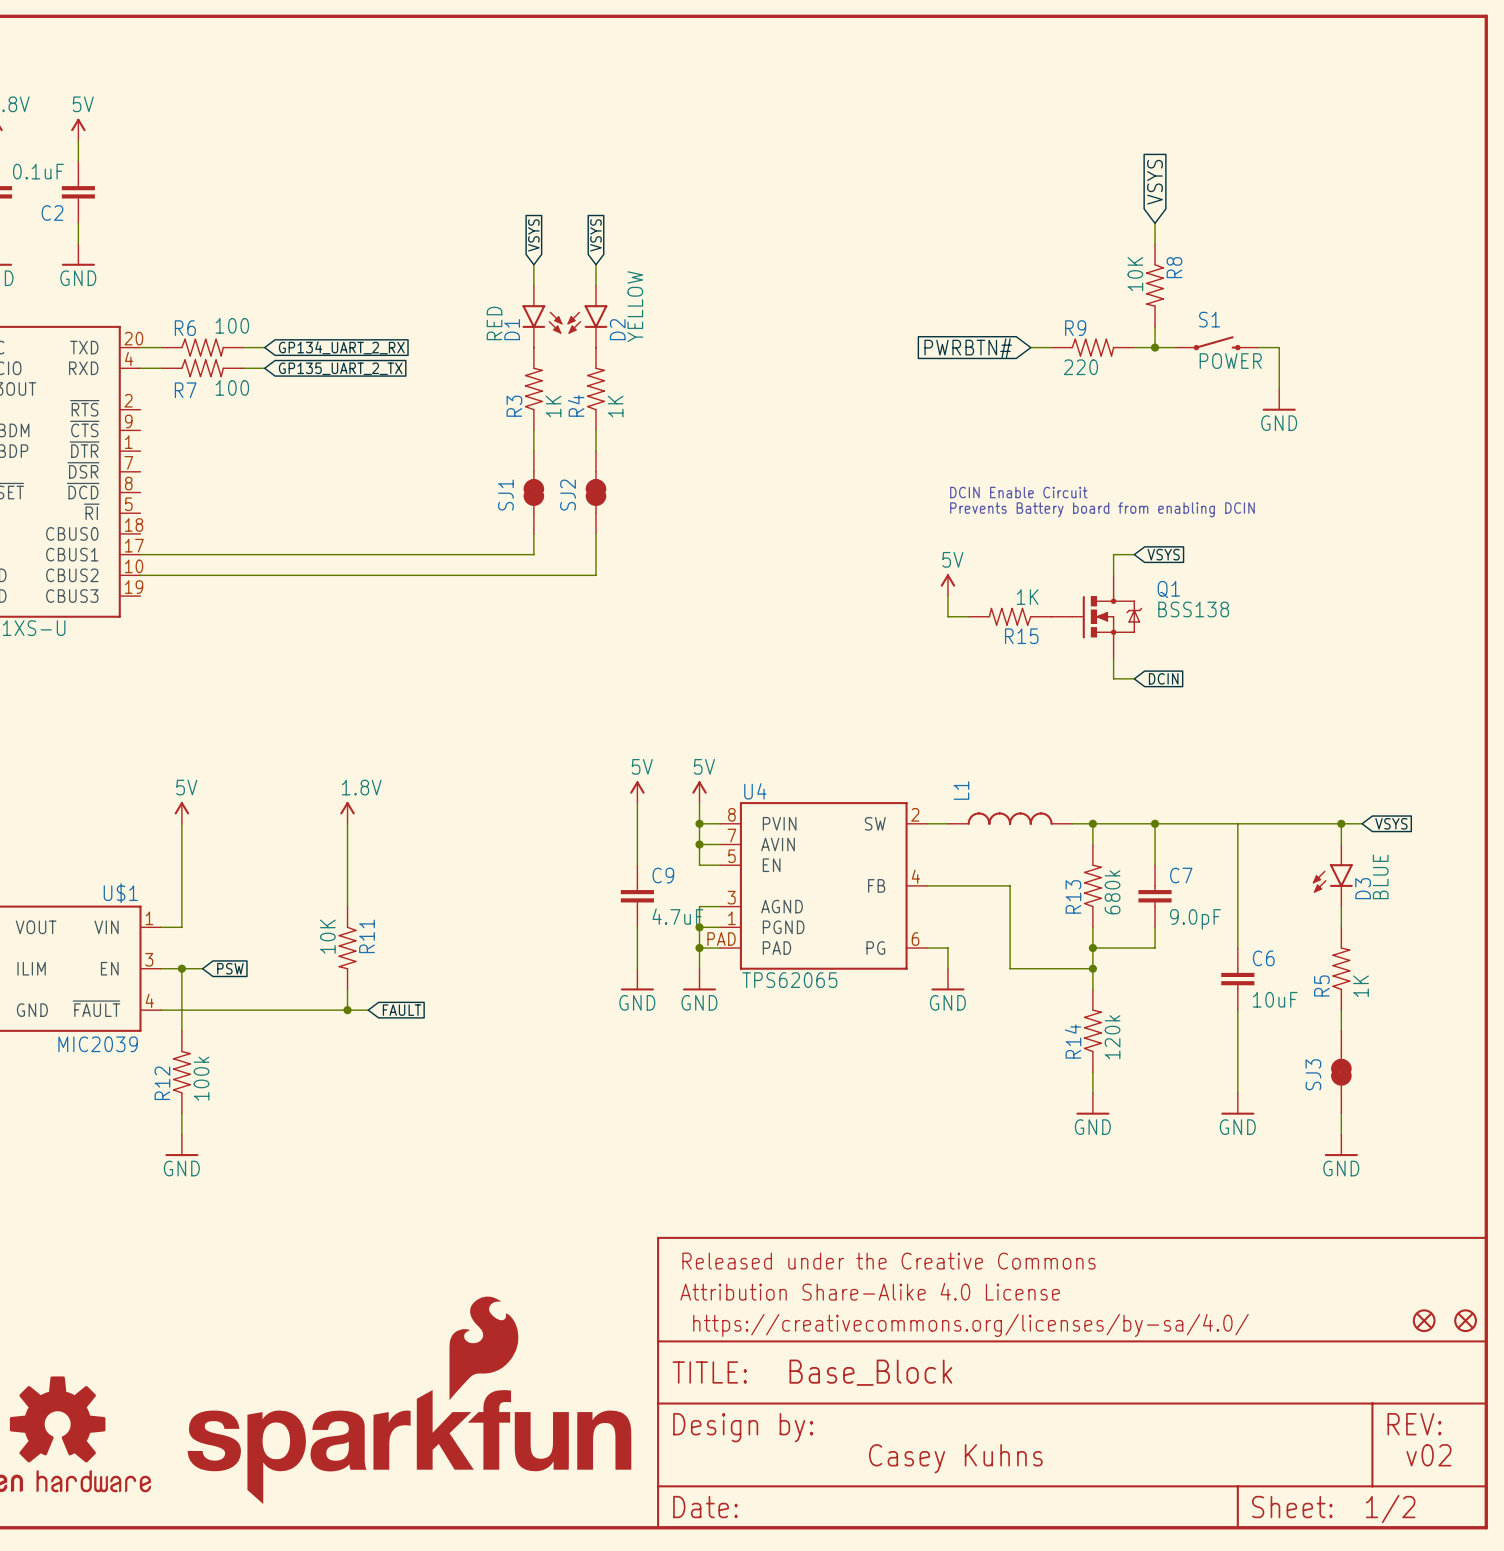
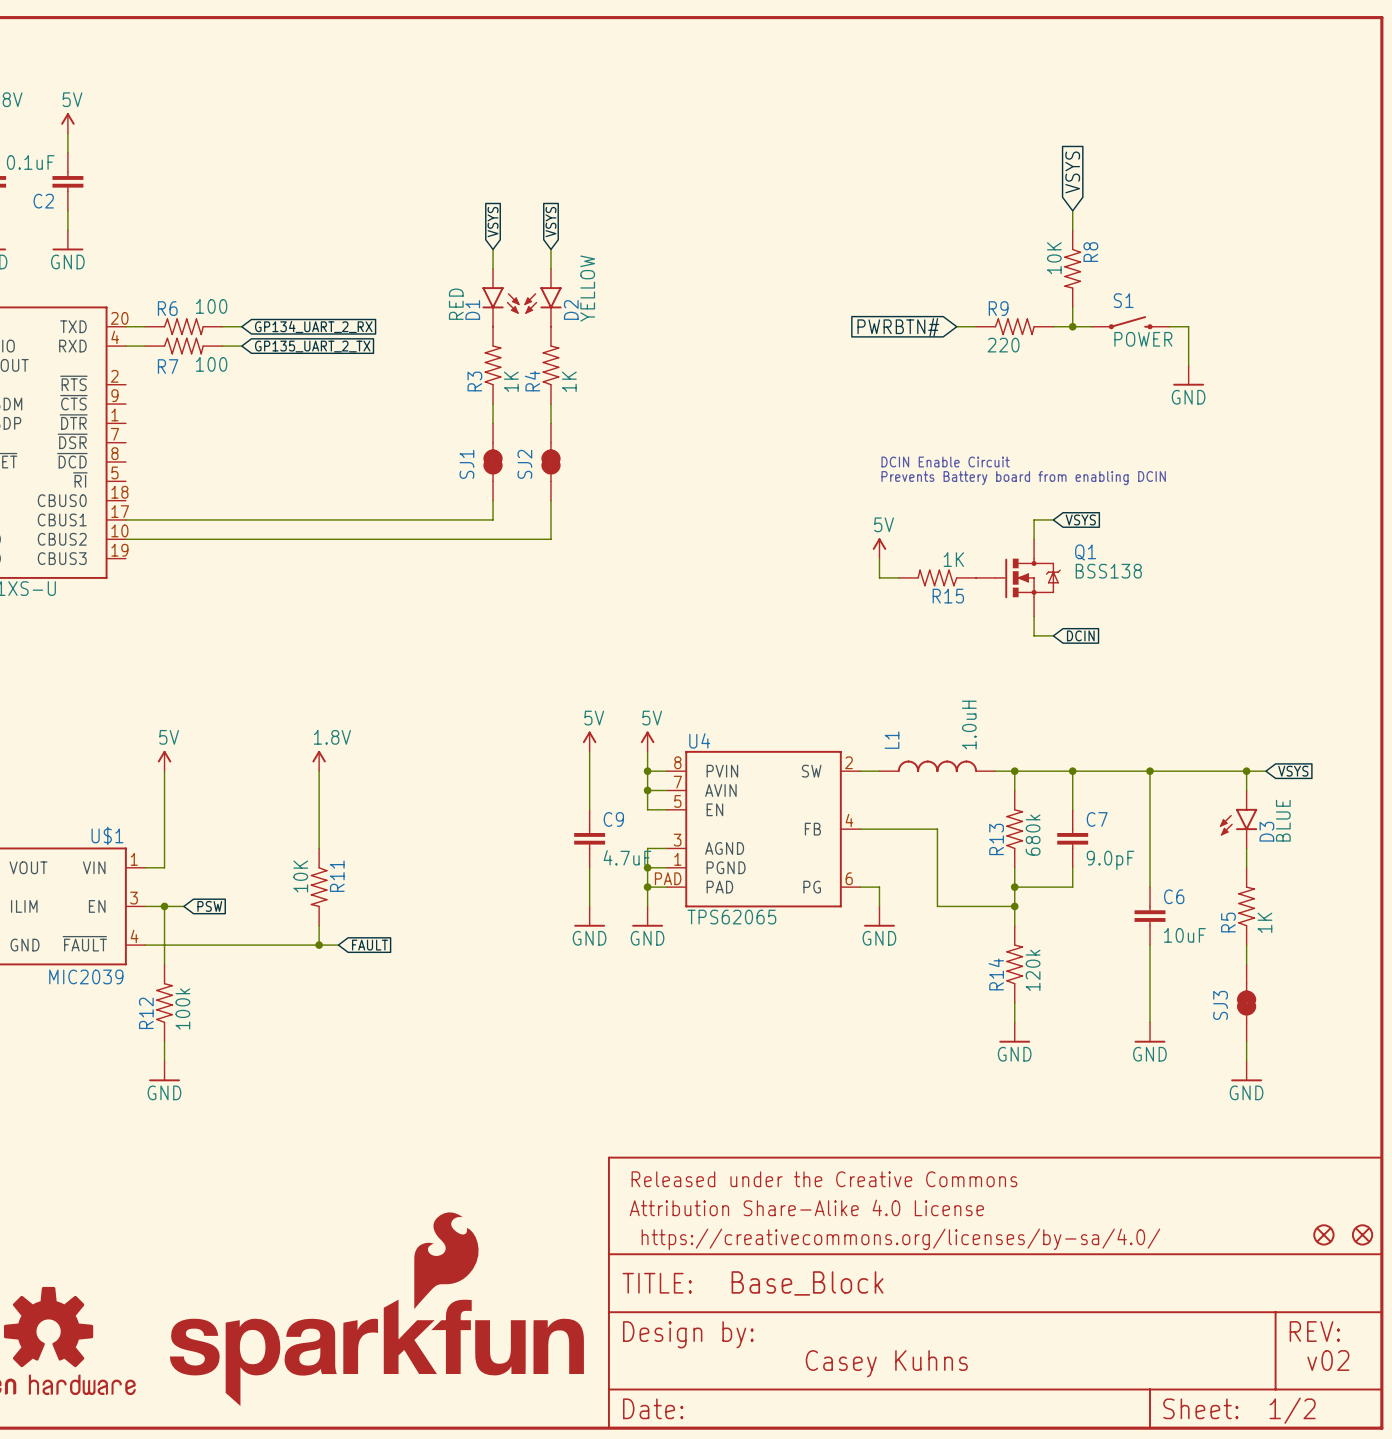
L1 value: none -> 1.0uH (969, 725)
junction: none -> (1149, 771)

